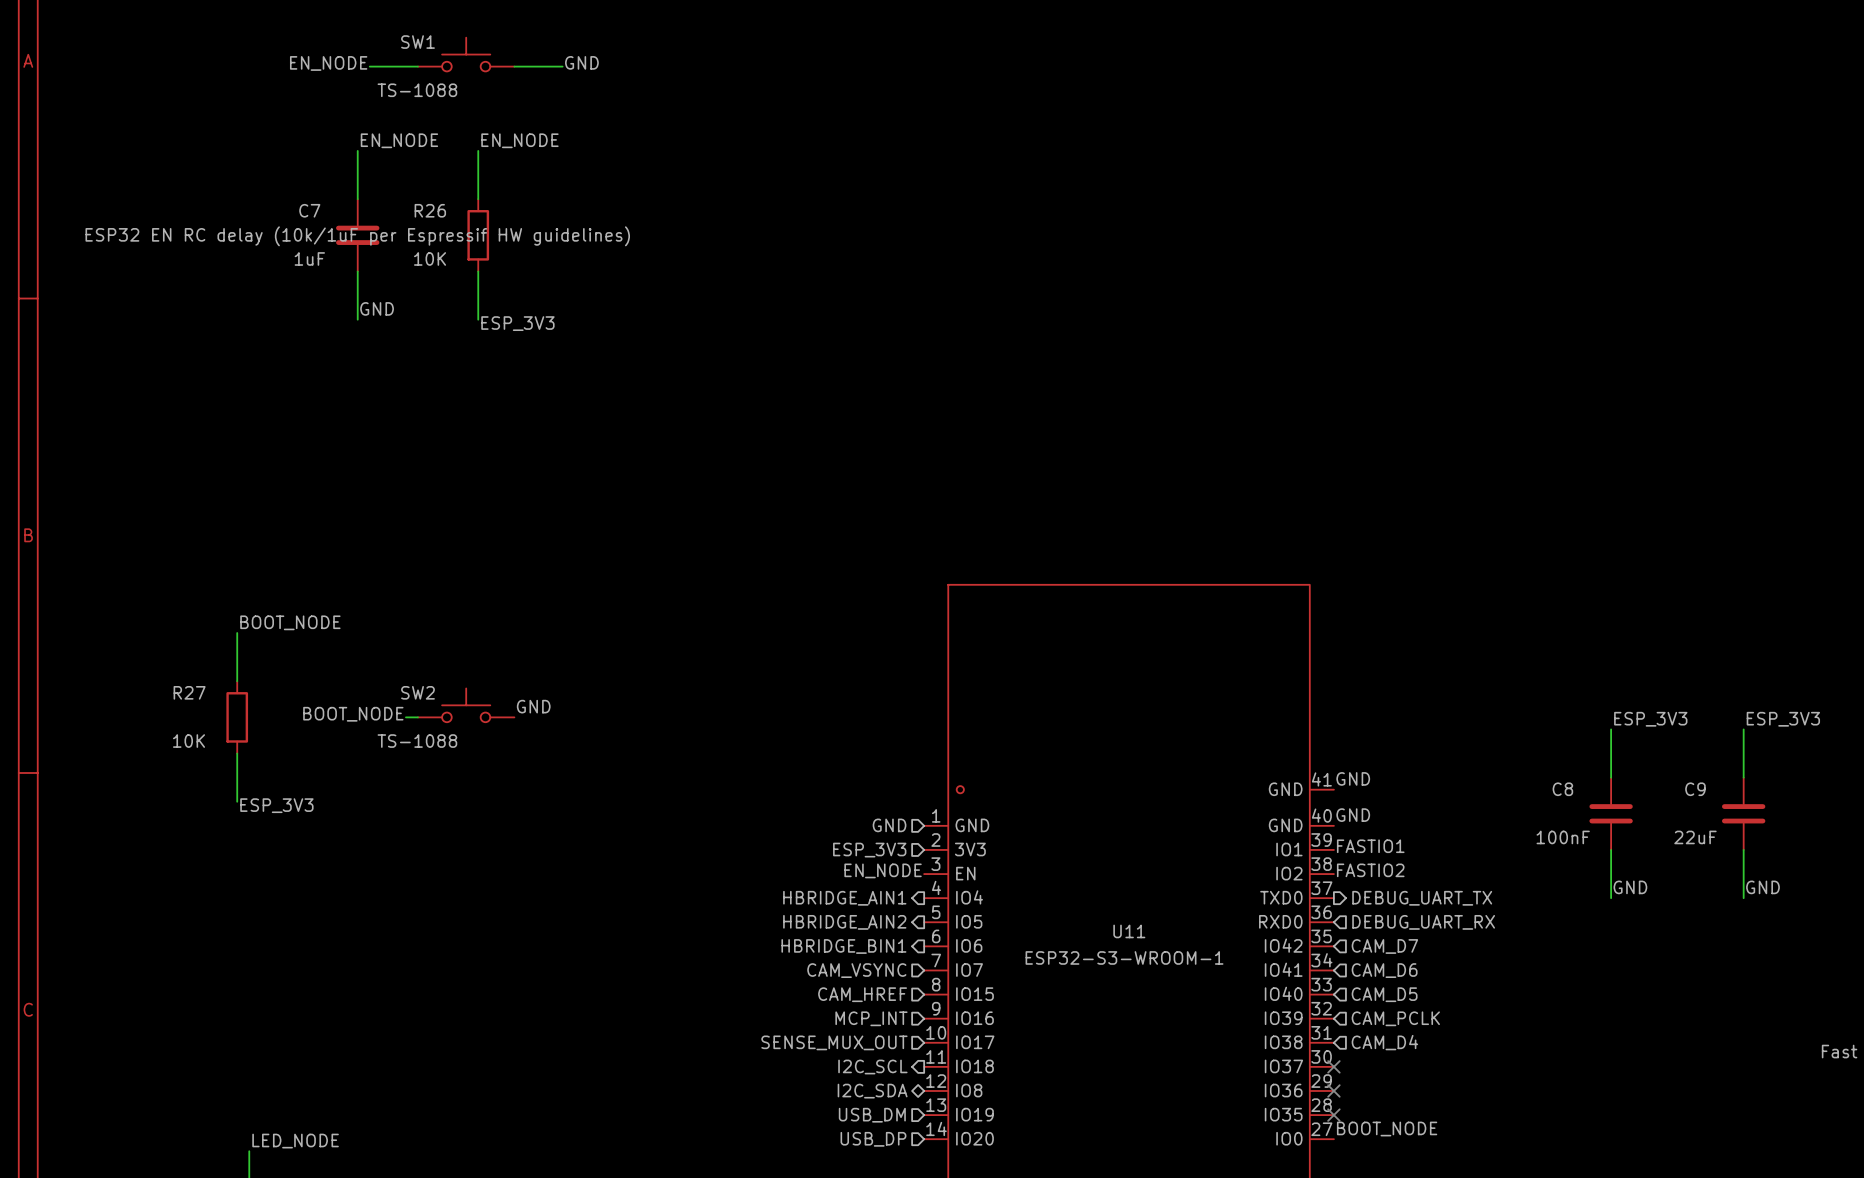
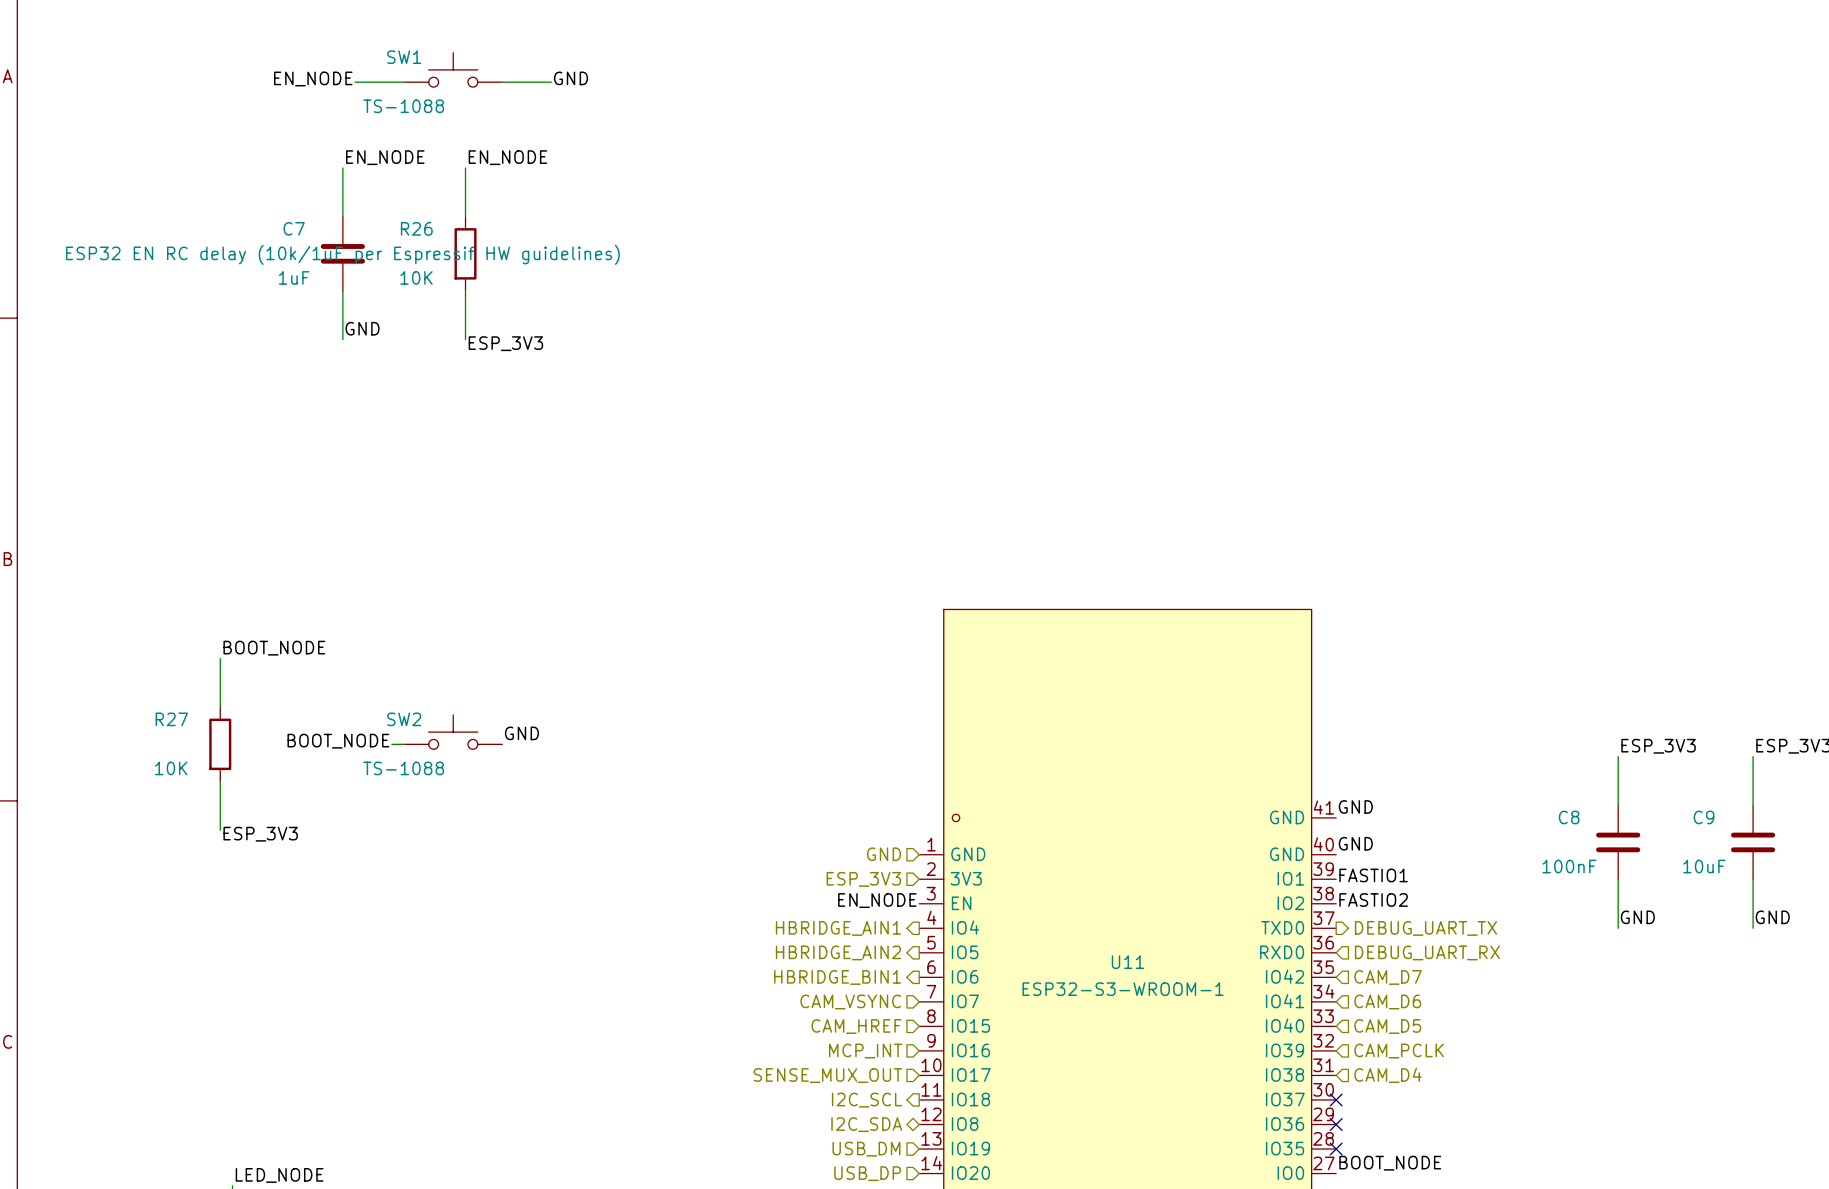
C9 value: 22uF (1695, 837) -> 10uF (1704, 866)

